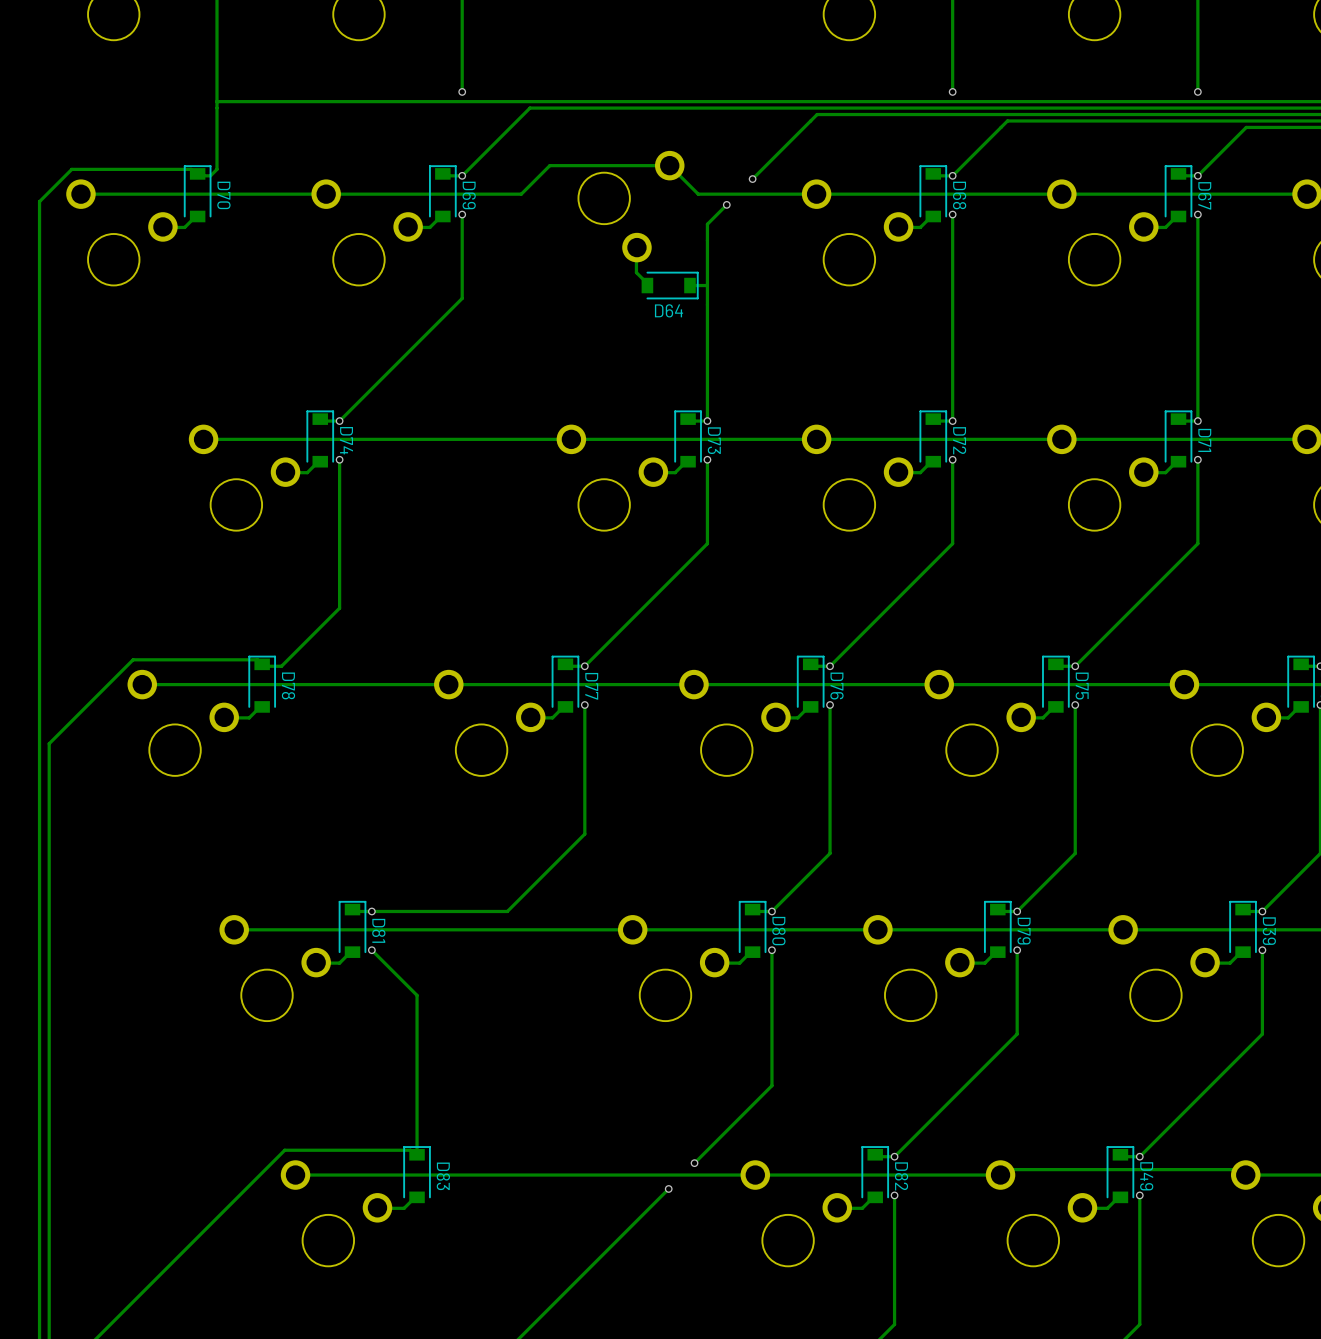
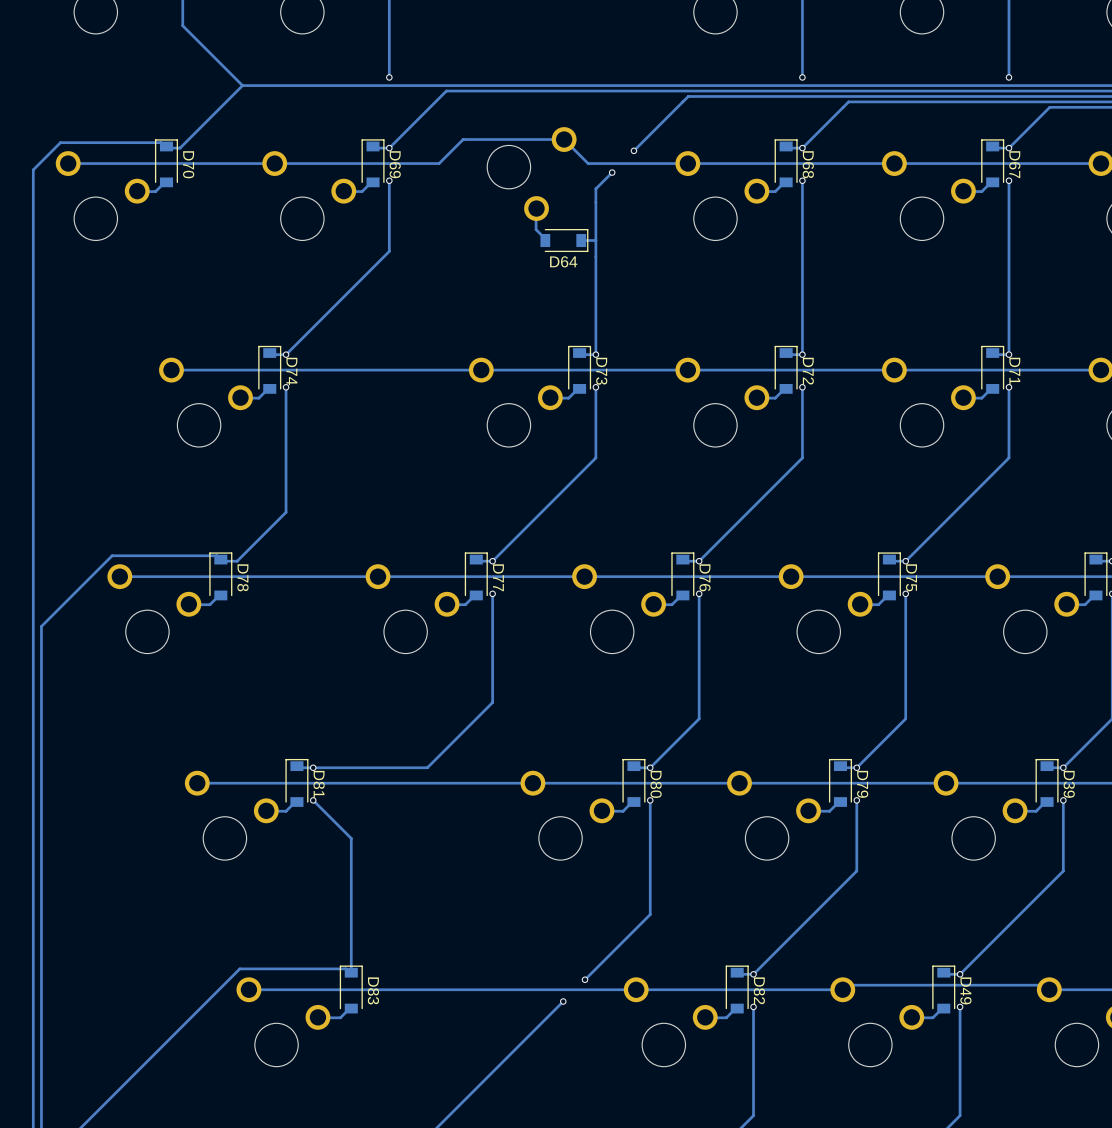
track: (217, 30) (217, 169) (210, 175) -> (182, 25) (242, 85) (180, 148) (177, 148)
track: (287, 101) (217, 101) -> none

